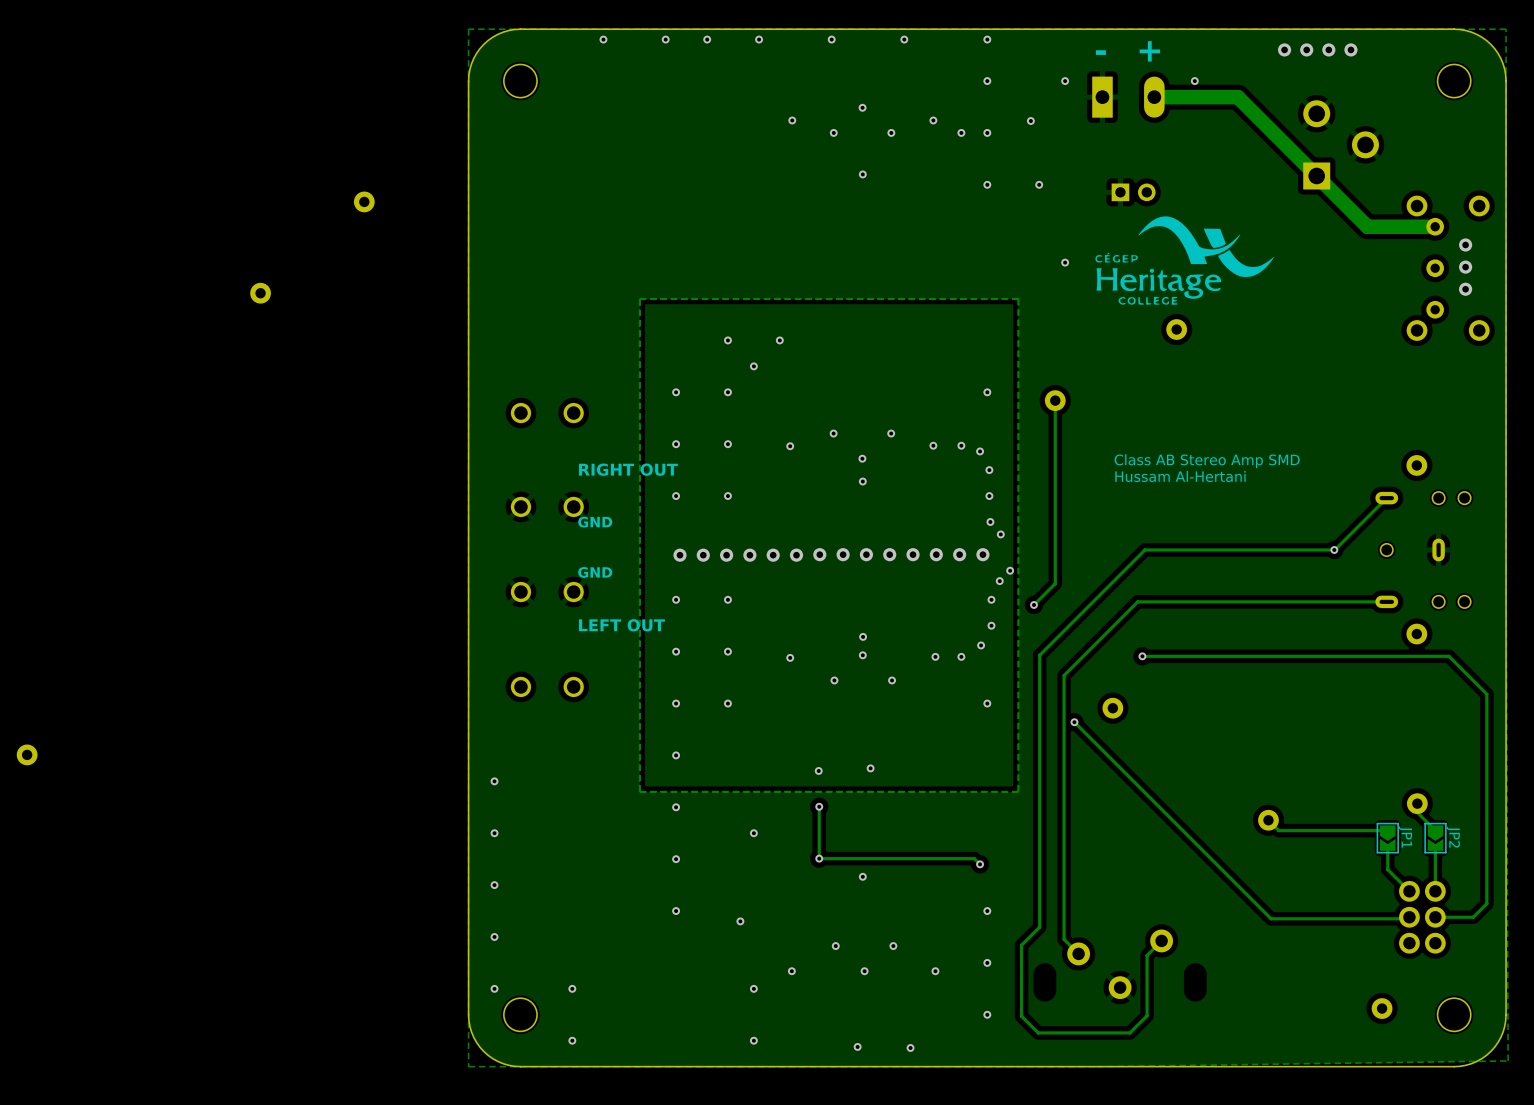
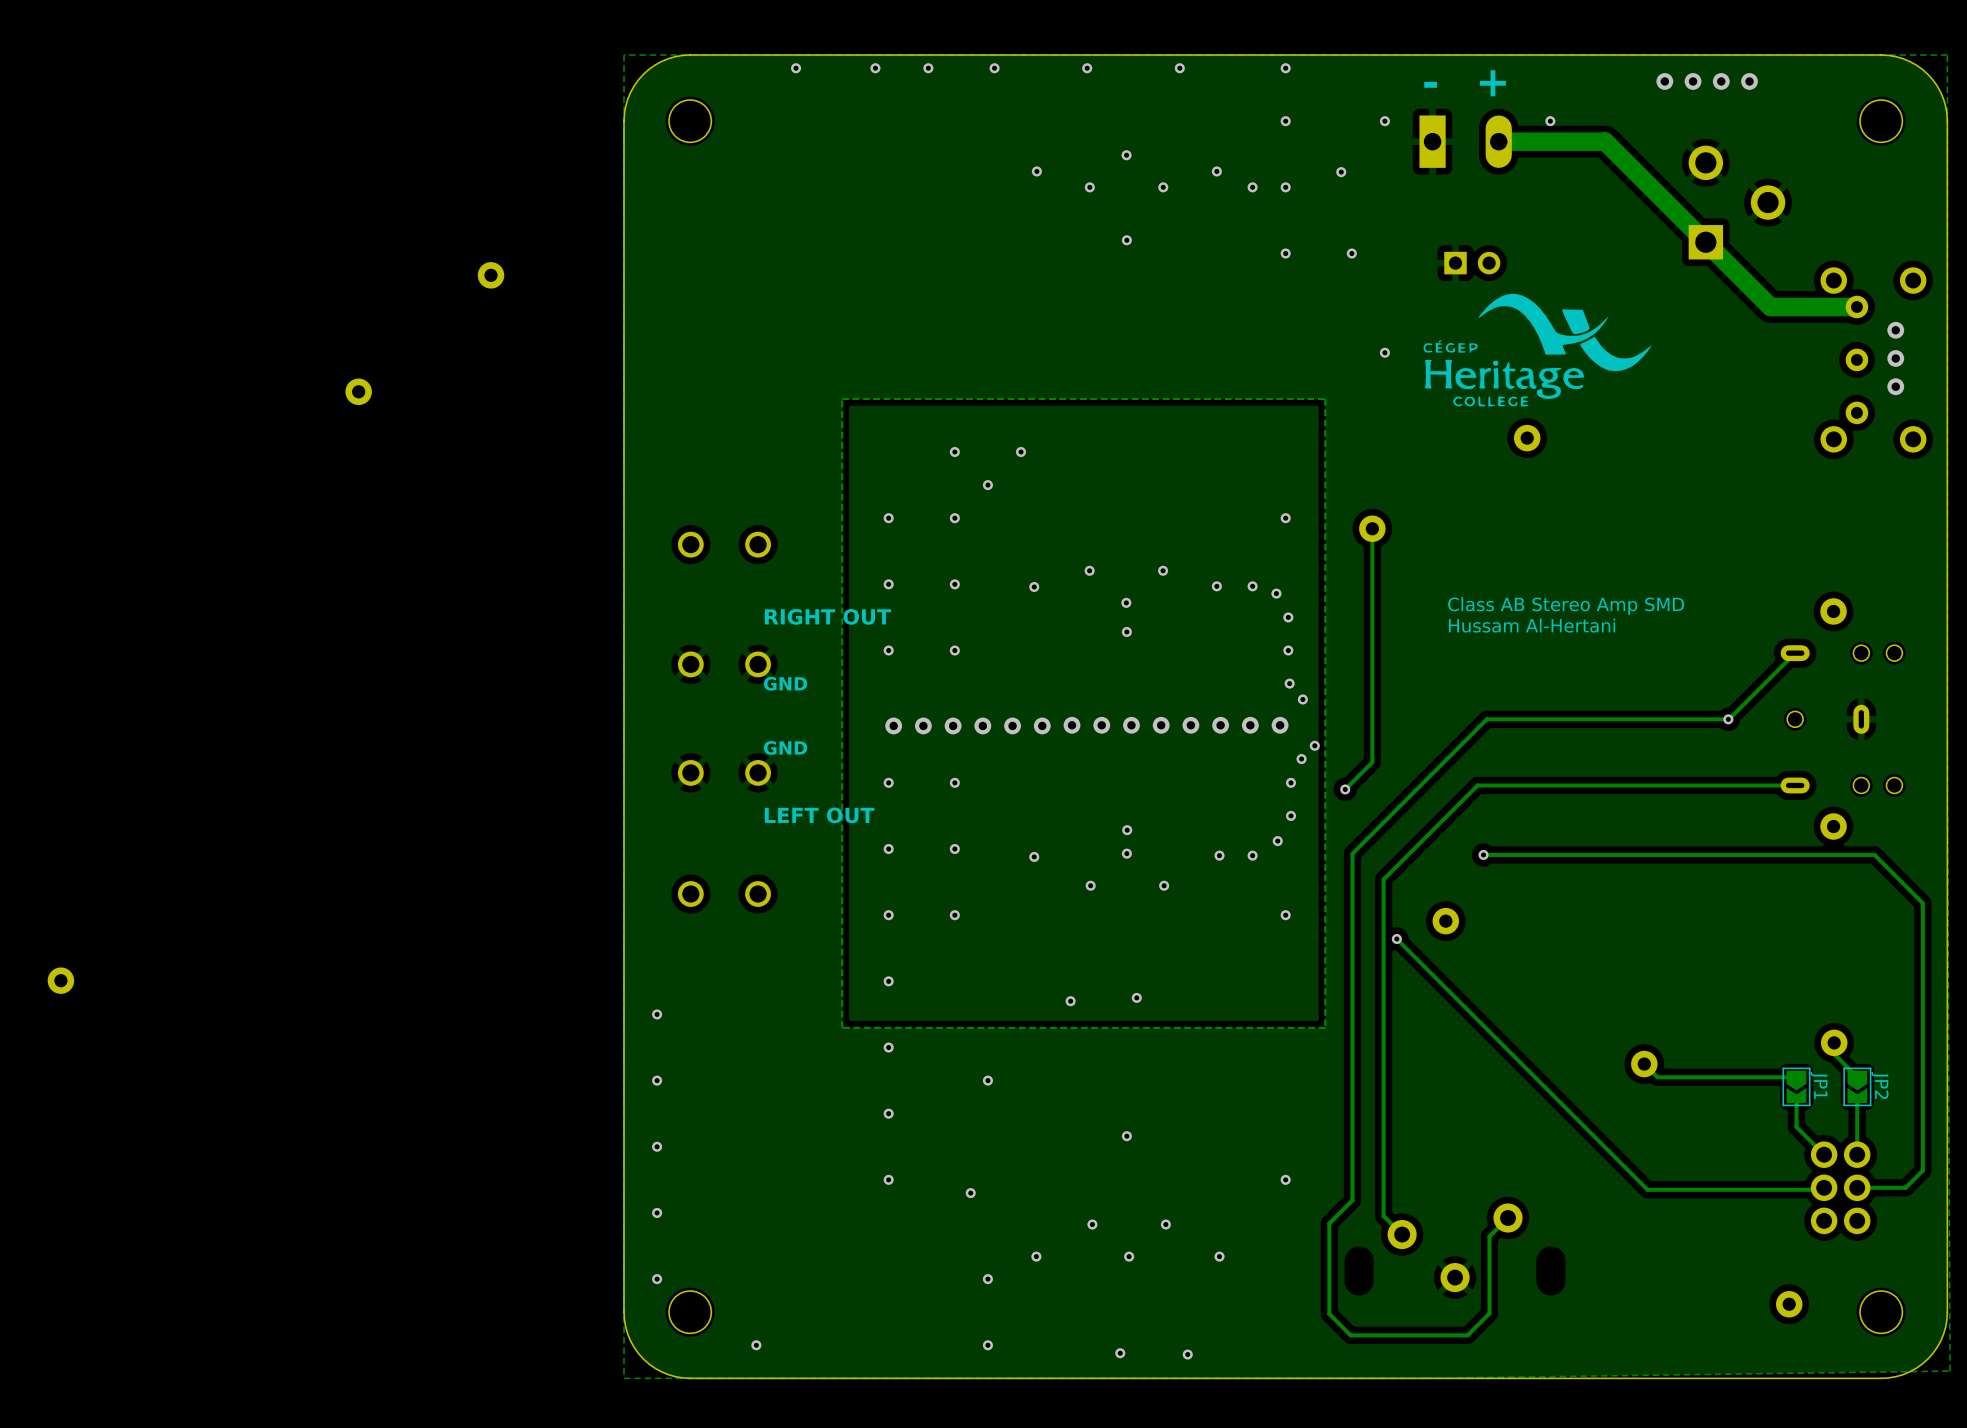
track: (819, 806) (819, 858) (974, 858) (980, 864) -> none
via: (819, 806) -> none
via: (819, 858) -> none
via: (980, 864) -> none
via: (987, 962) -> none
via: (572, 988) -> none
via: (987, 1014) -> none

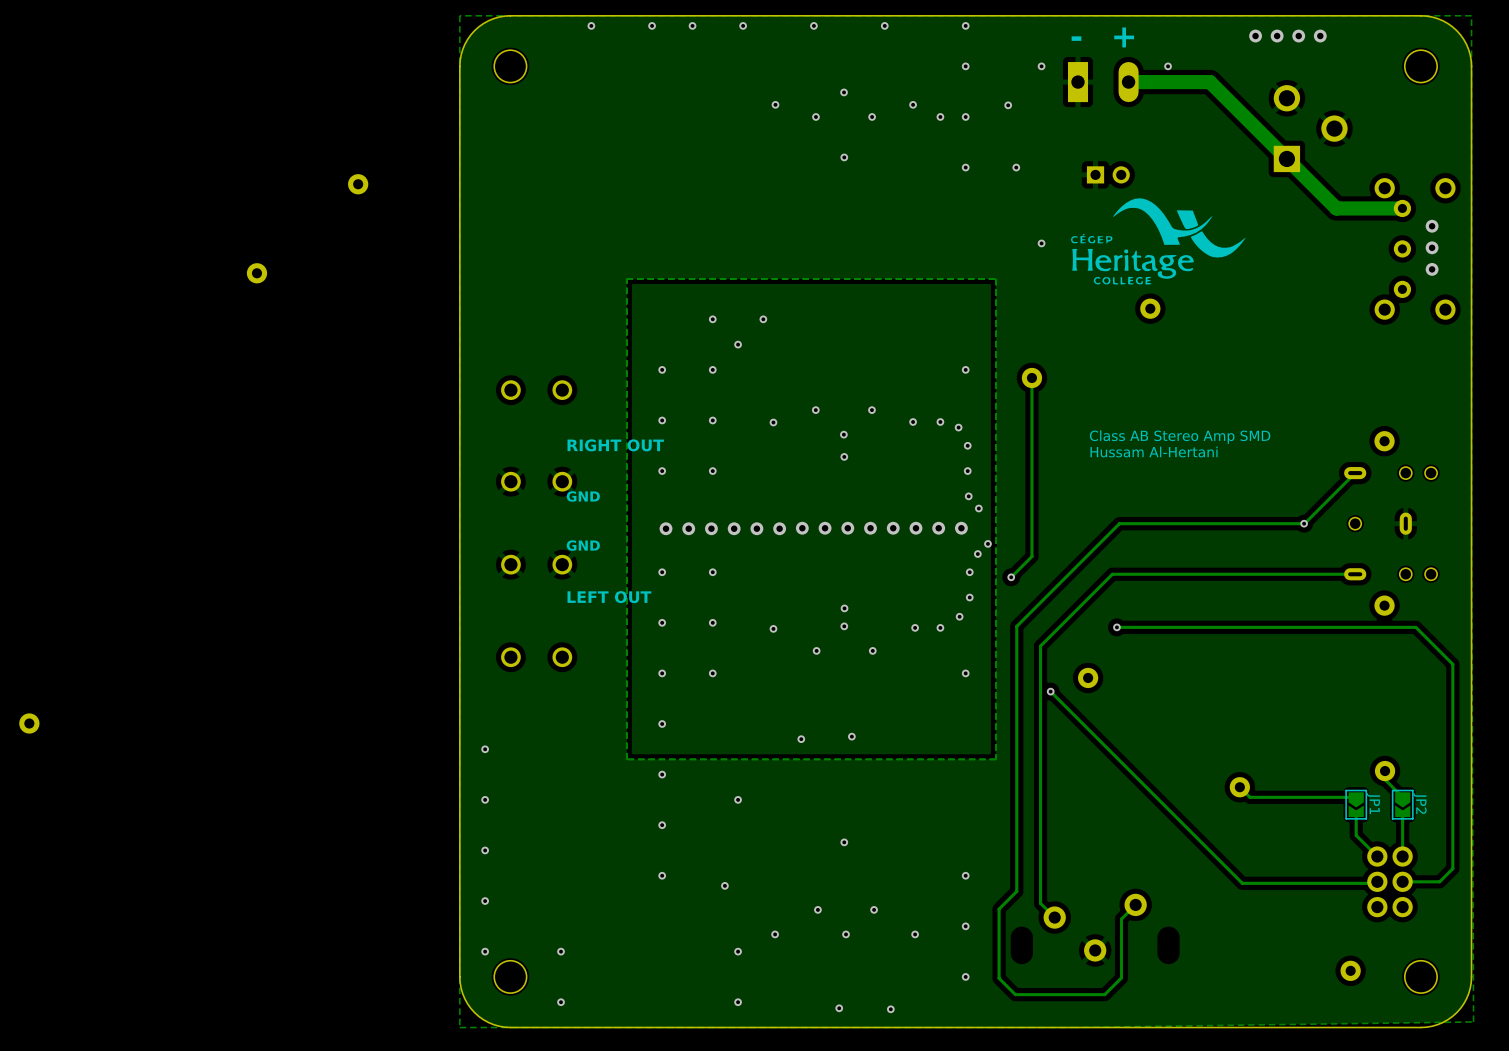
via: none -> (965, 926)
via: none -> (561, 951)
via: none -> (965, 976)

